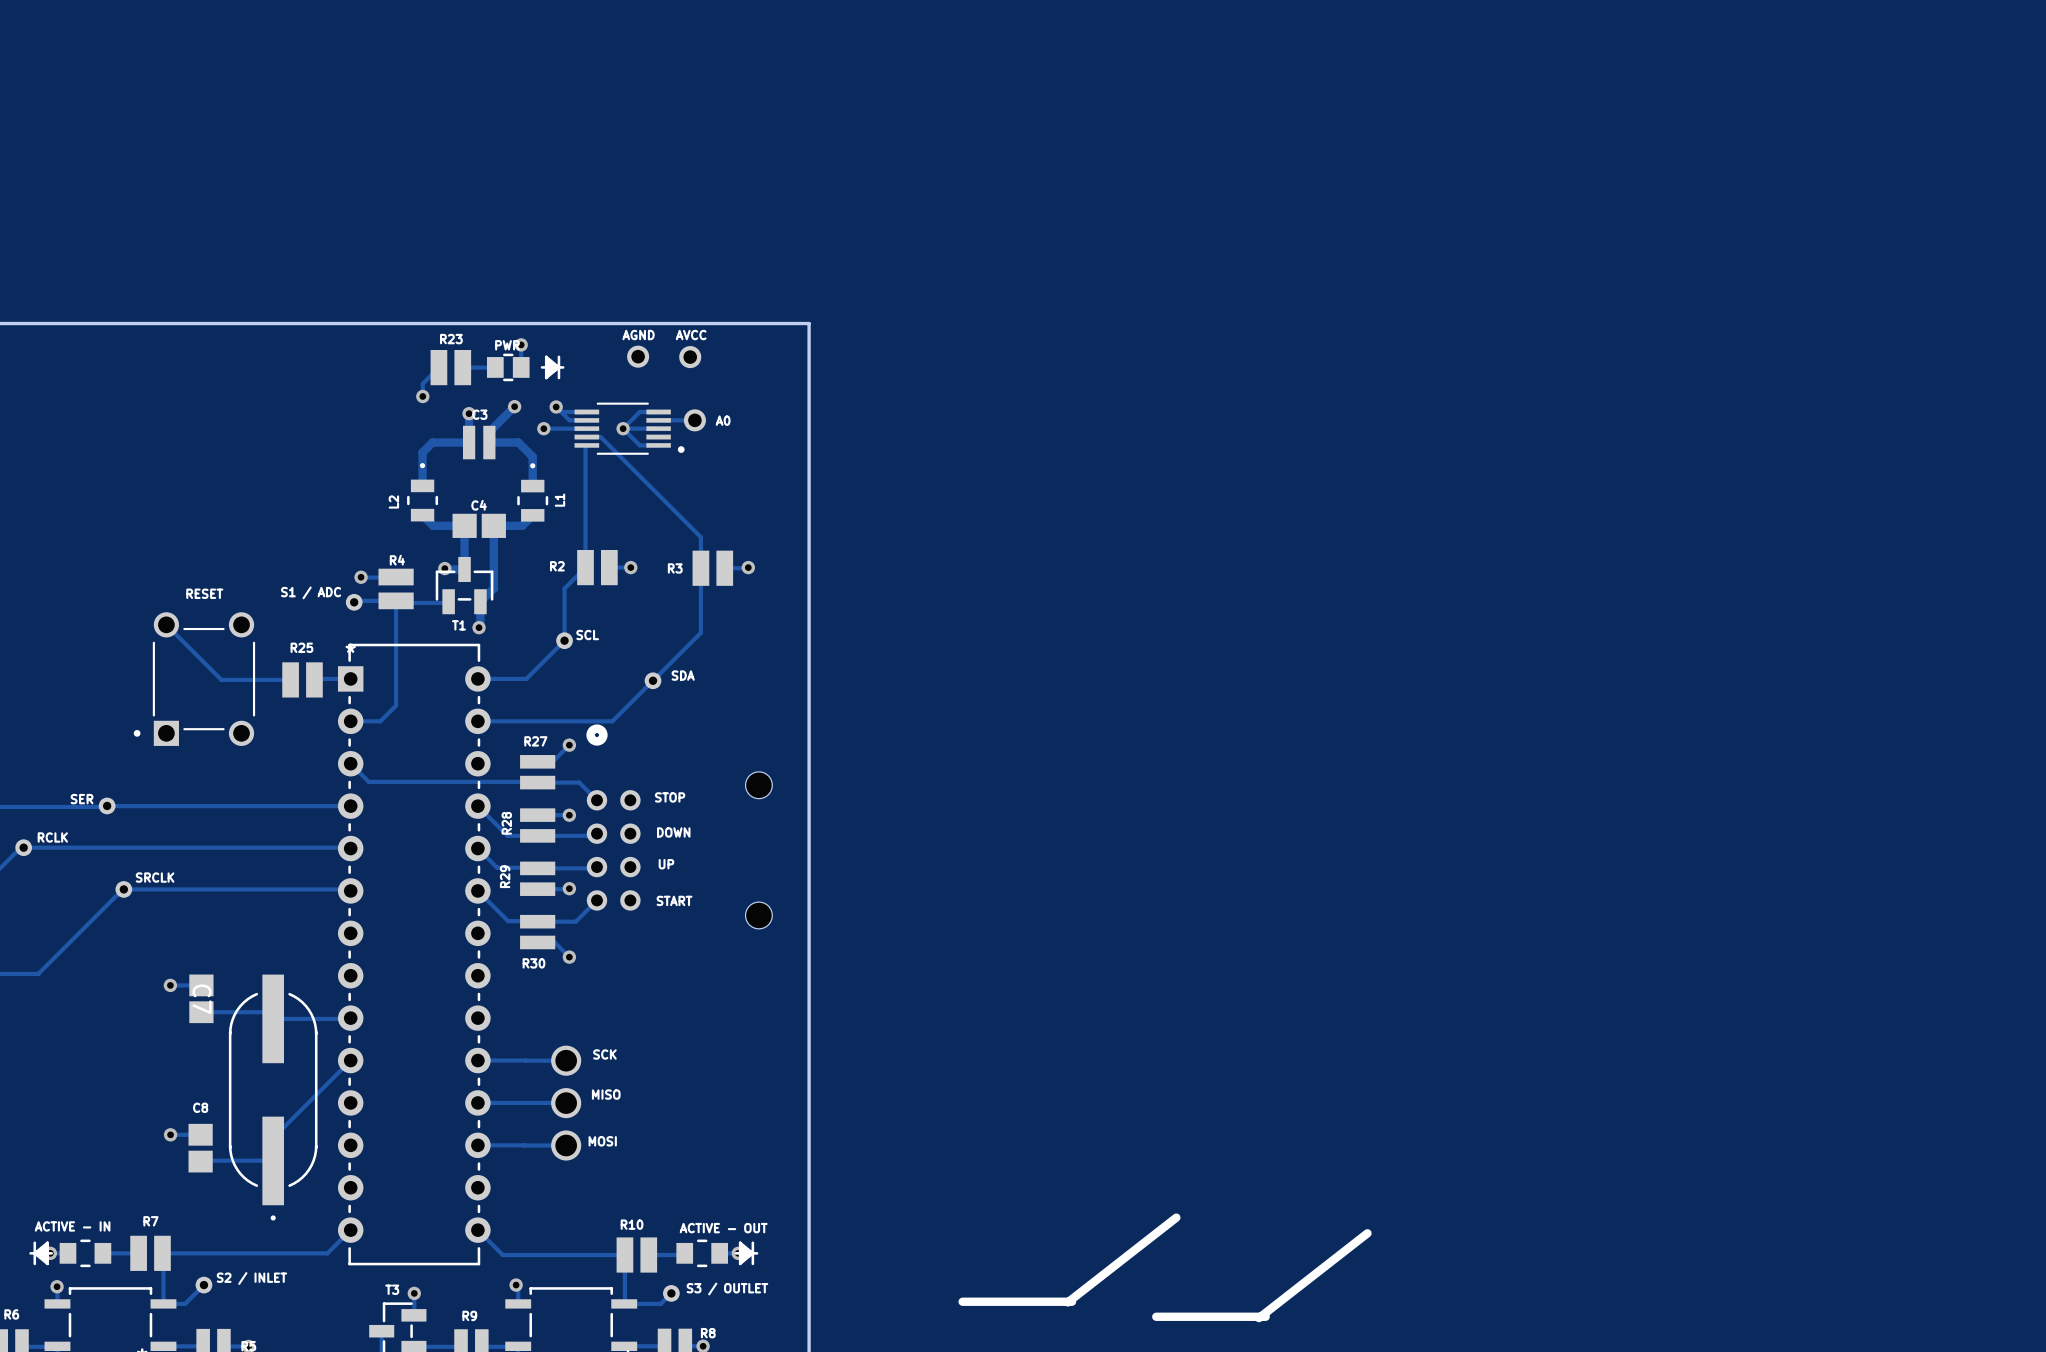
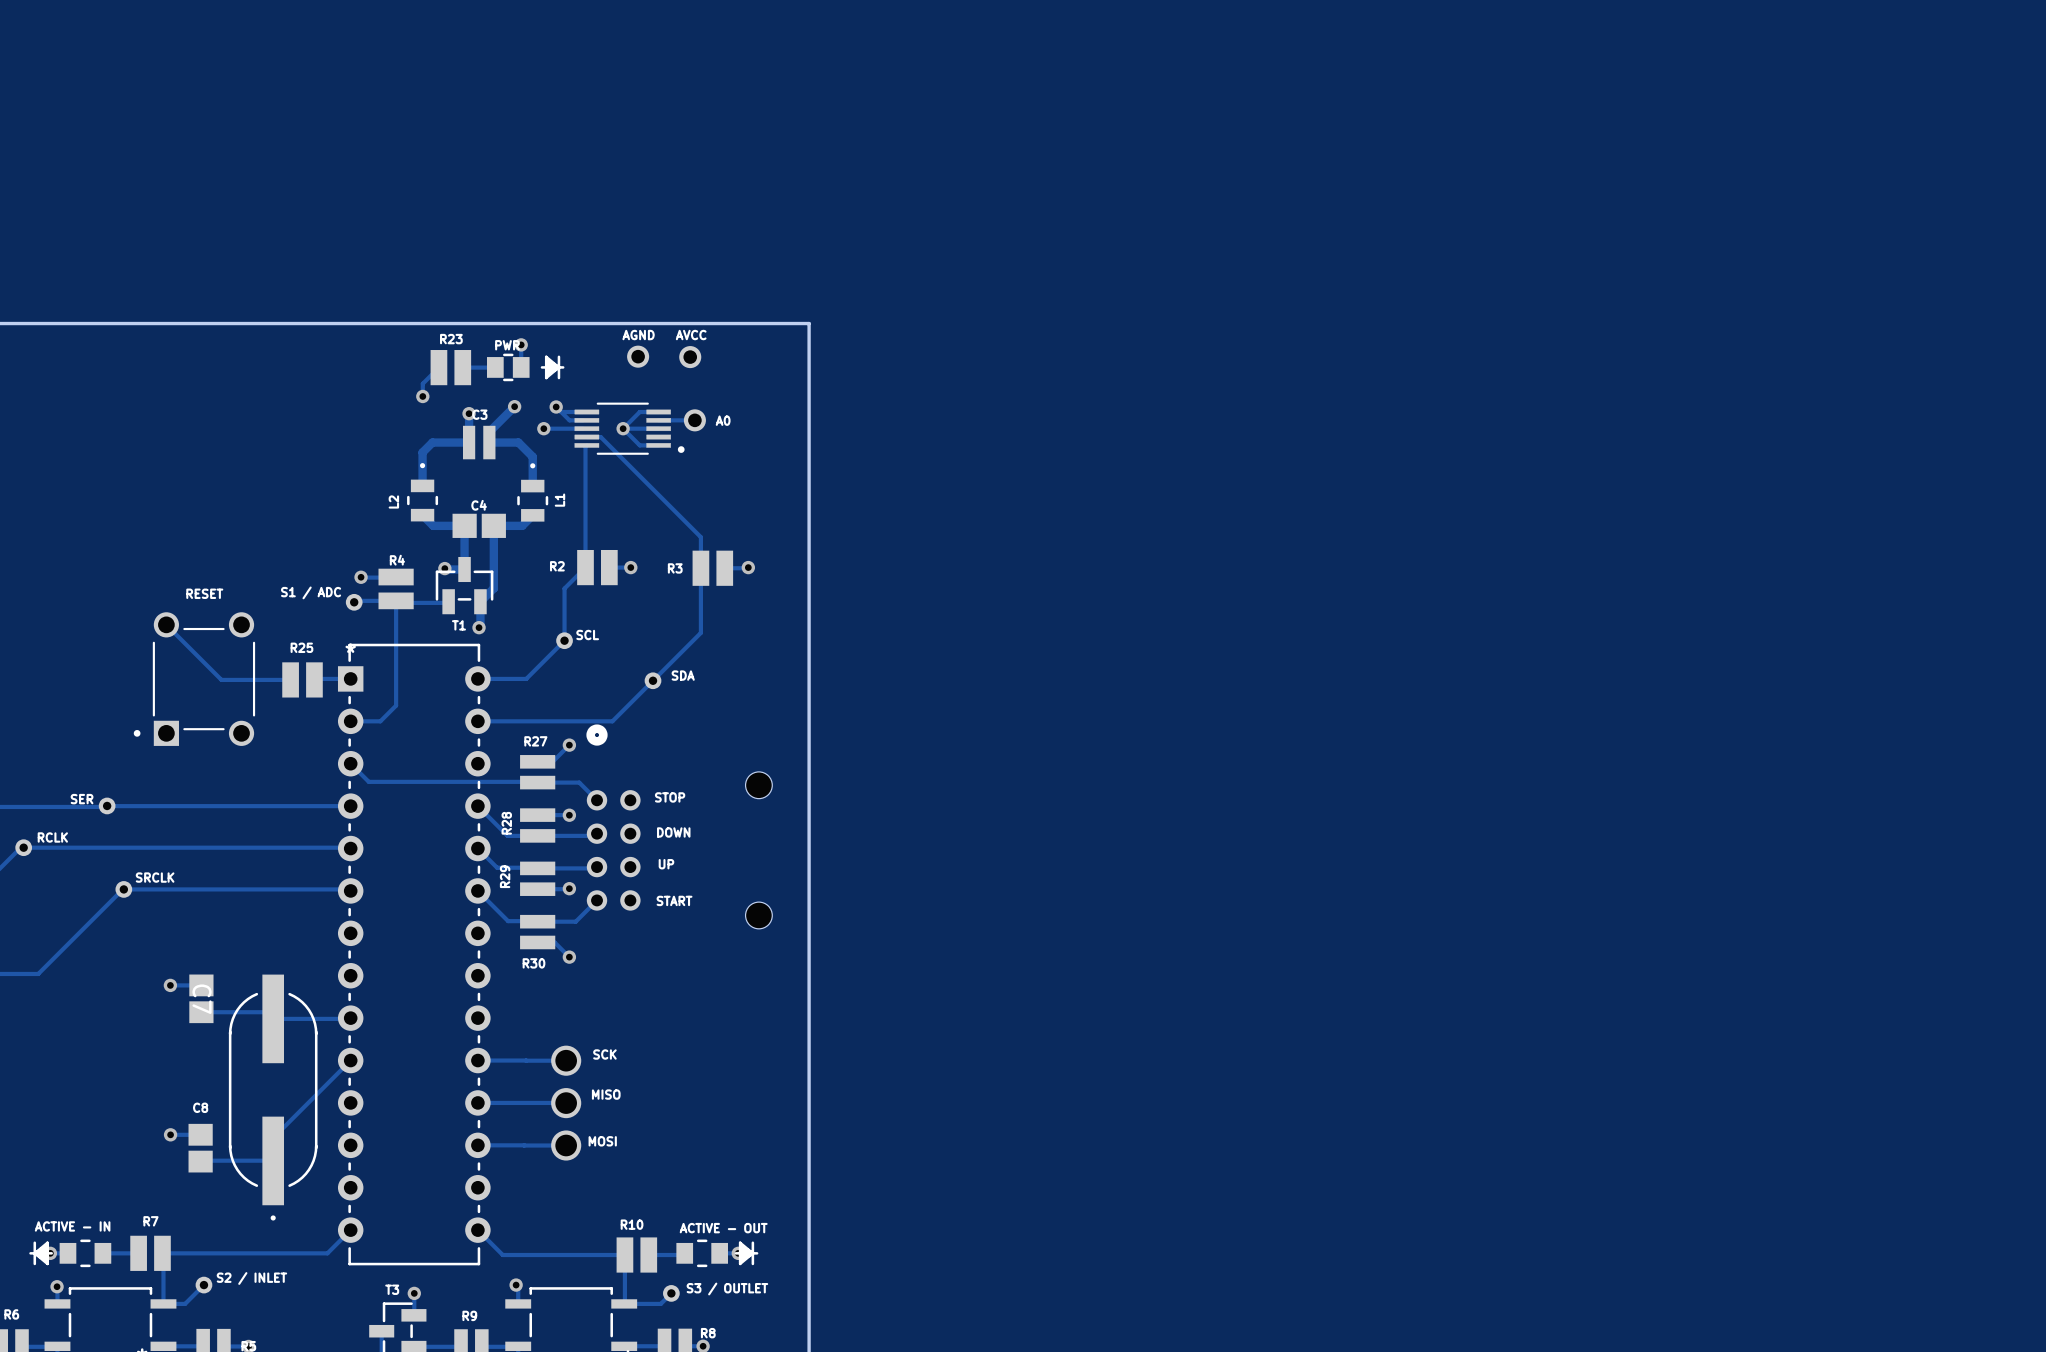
line: (1176, 1217) (1067, 1302) -> none
line: (1367, 1233) (1258, 1318) -> none
line: (962, 1301) (1072, 1301) -> none
line: (1156, 1316) (1265, 1316) -> none

